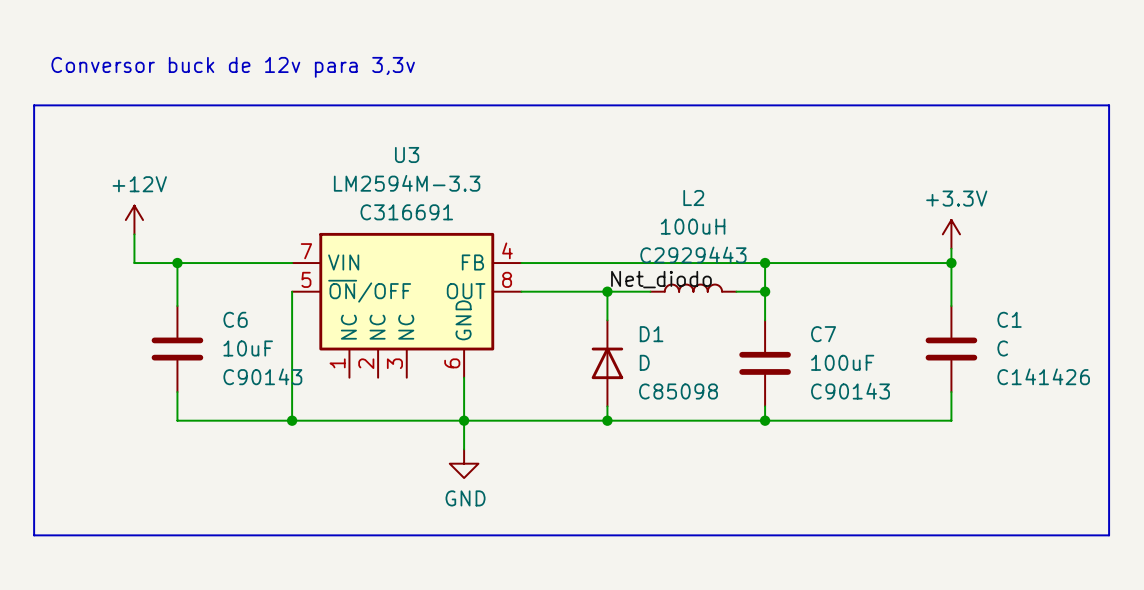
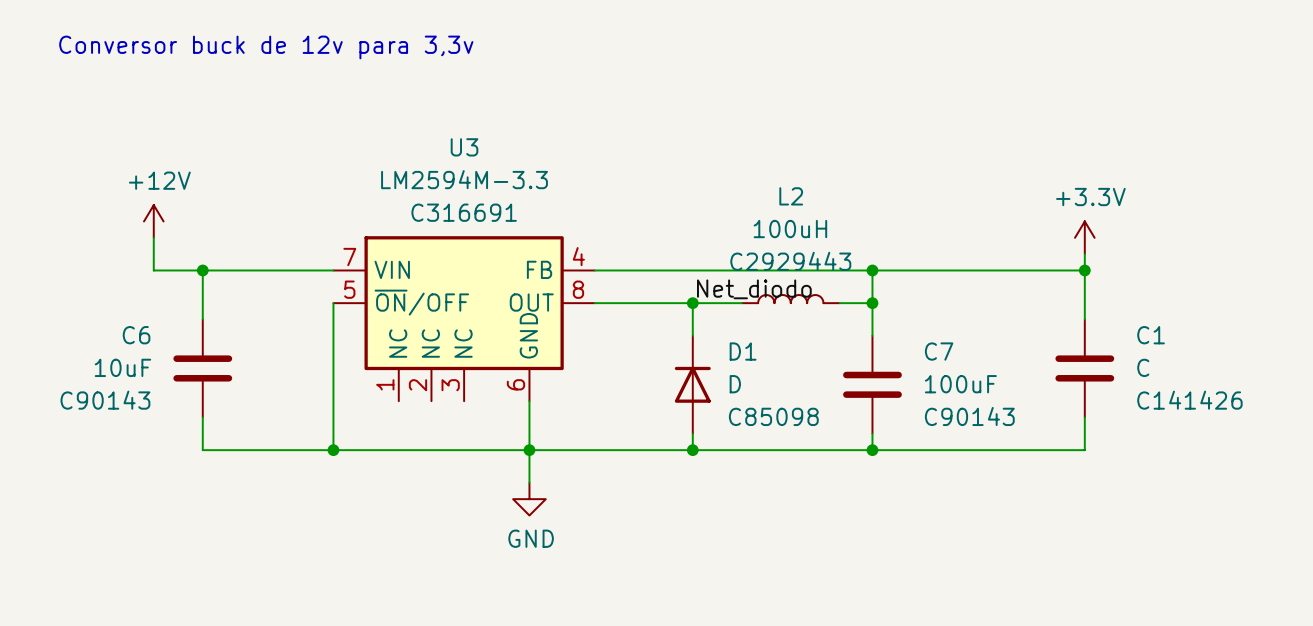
line: (34, 105) (1109, 105) (1109, 535) (34, 535) (34, 105) -> none
C6 name position: C6 (235, 319) -> C6 (136, 335)
C6 value position: 10uF (248, 348) -> 10uF (122, 367)
C6 text position: C90143 (262, 376) -> C90143 (105, 400)

